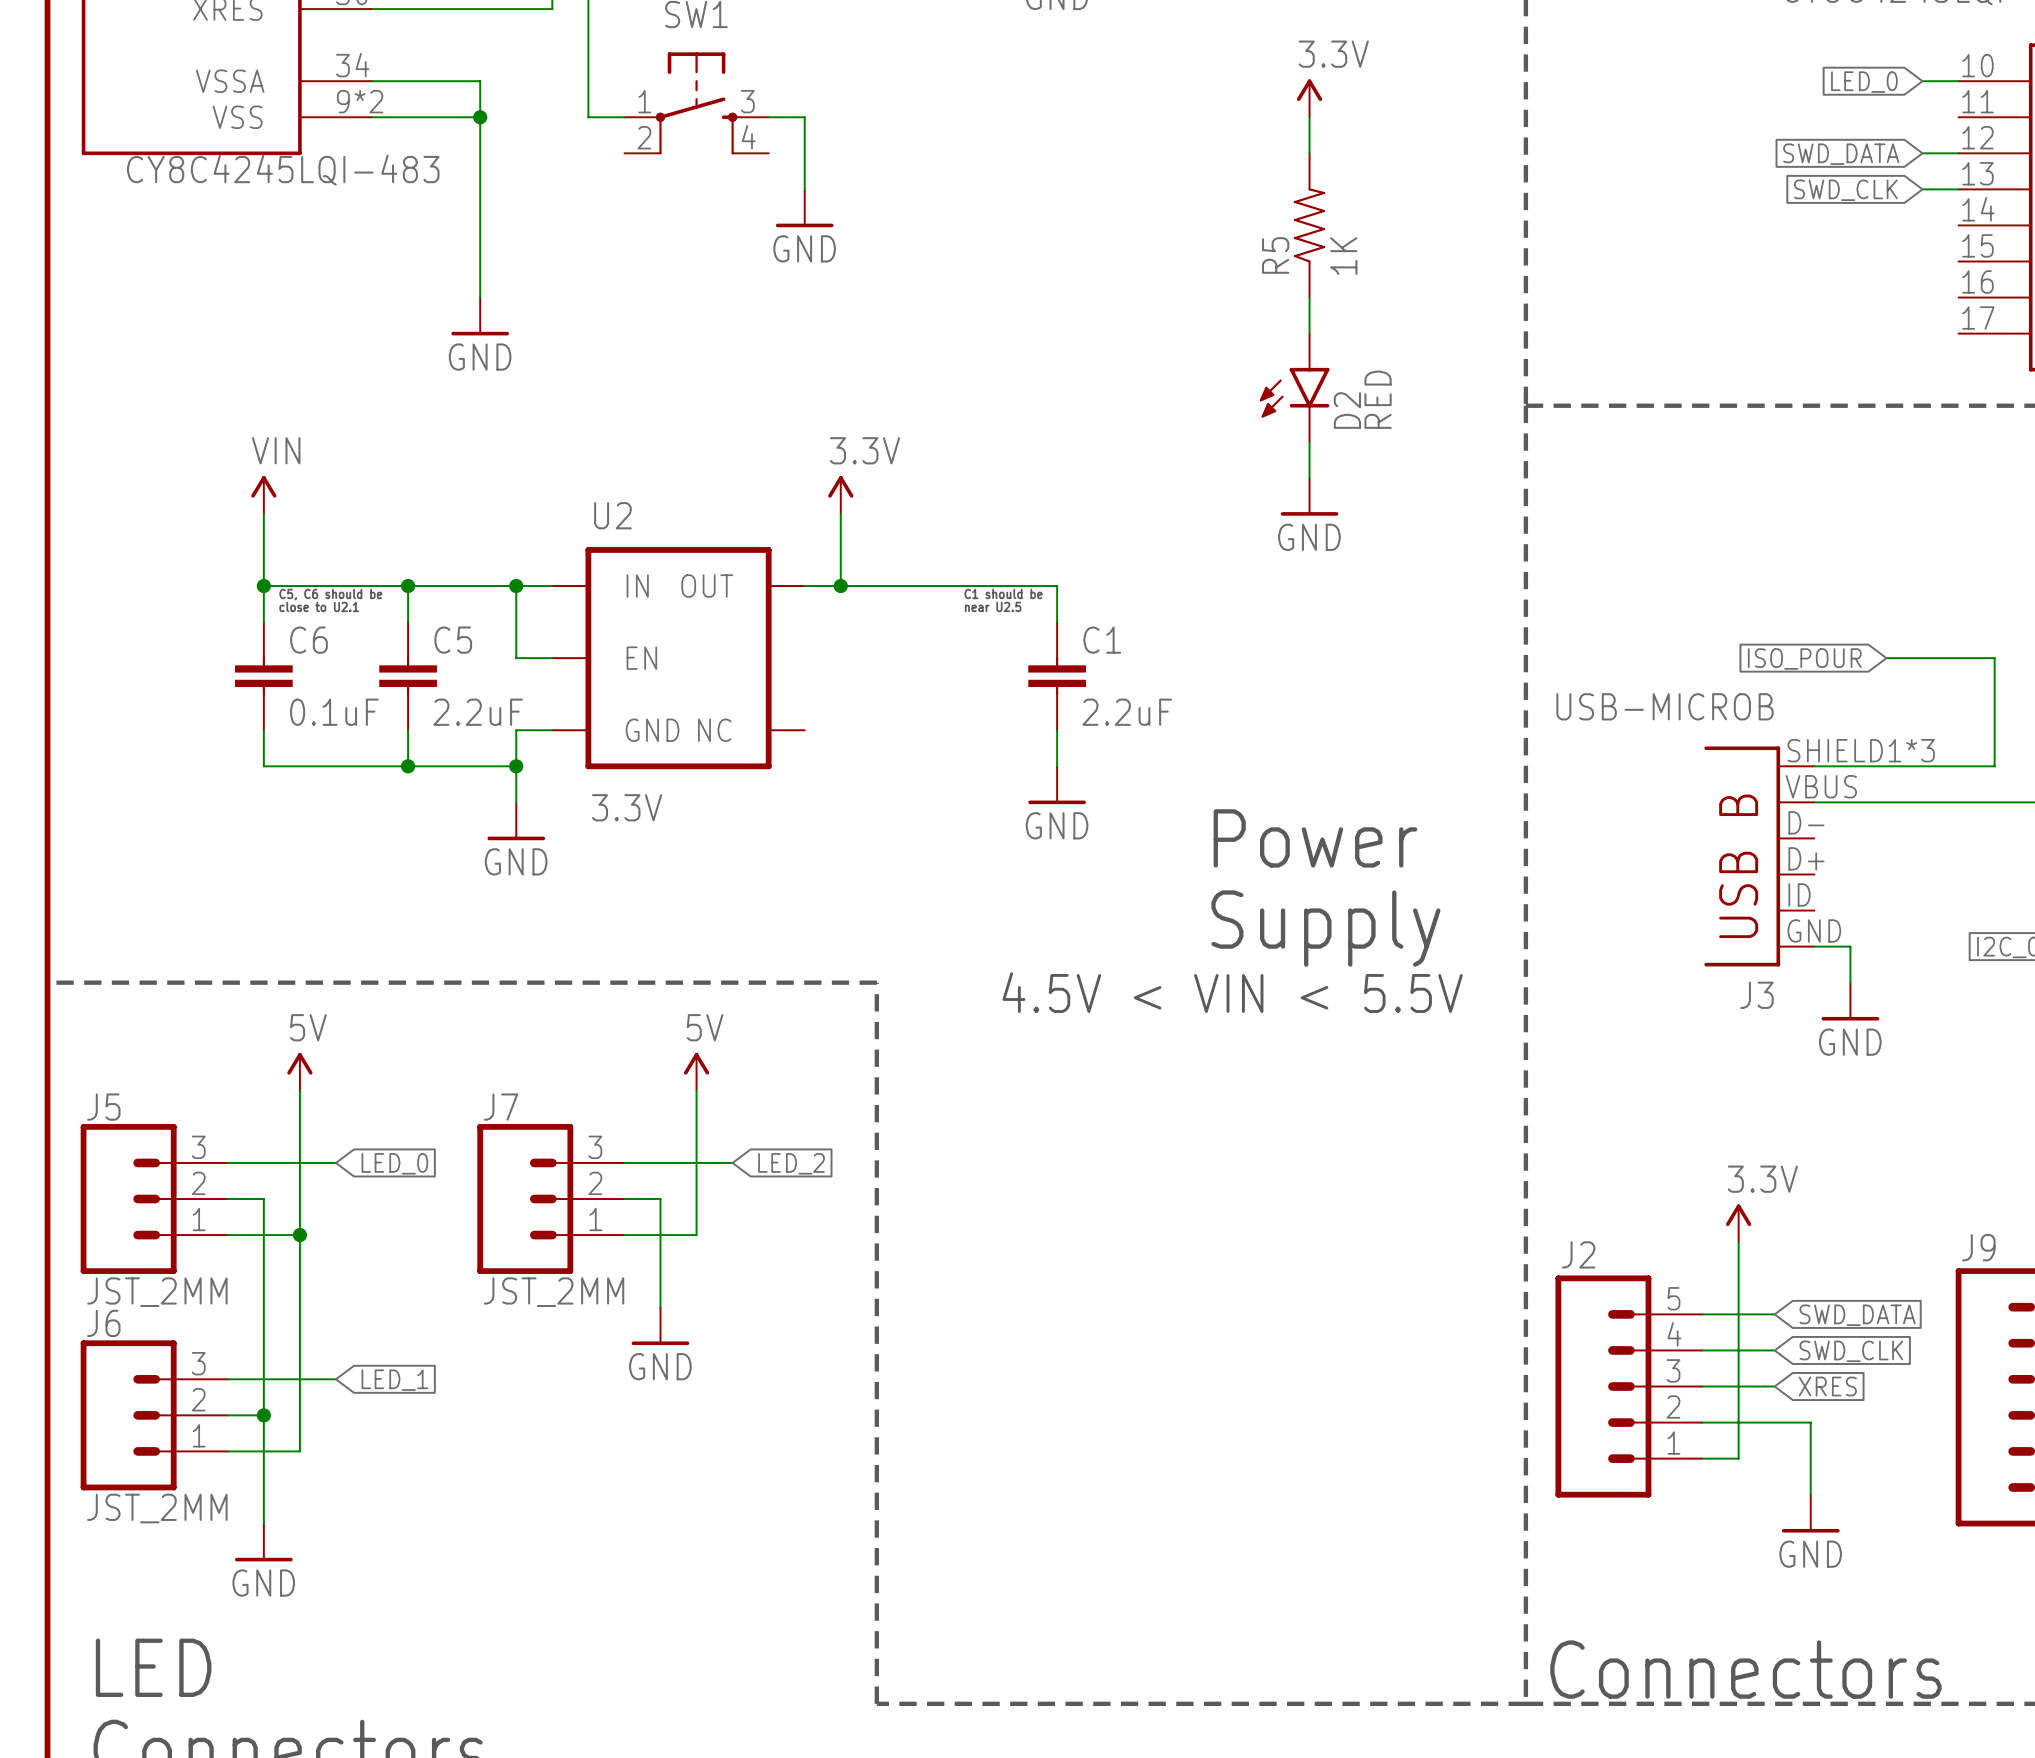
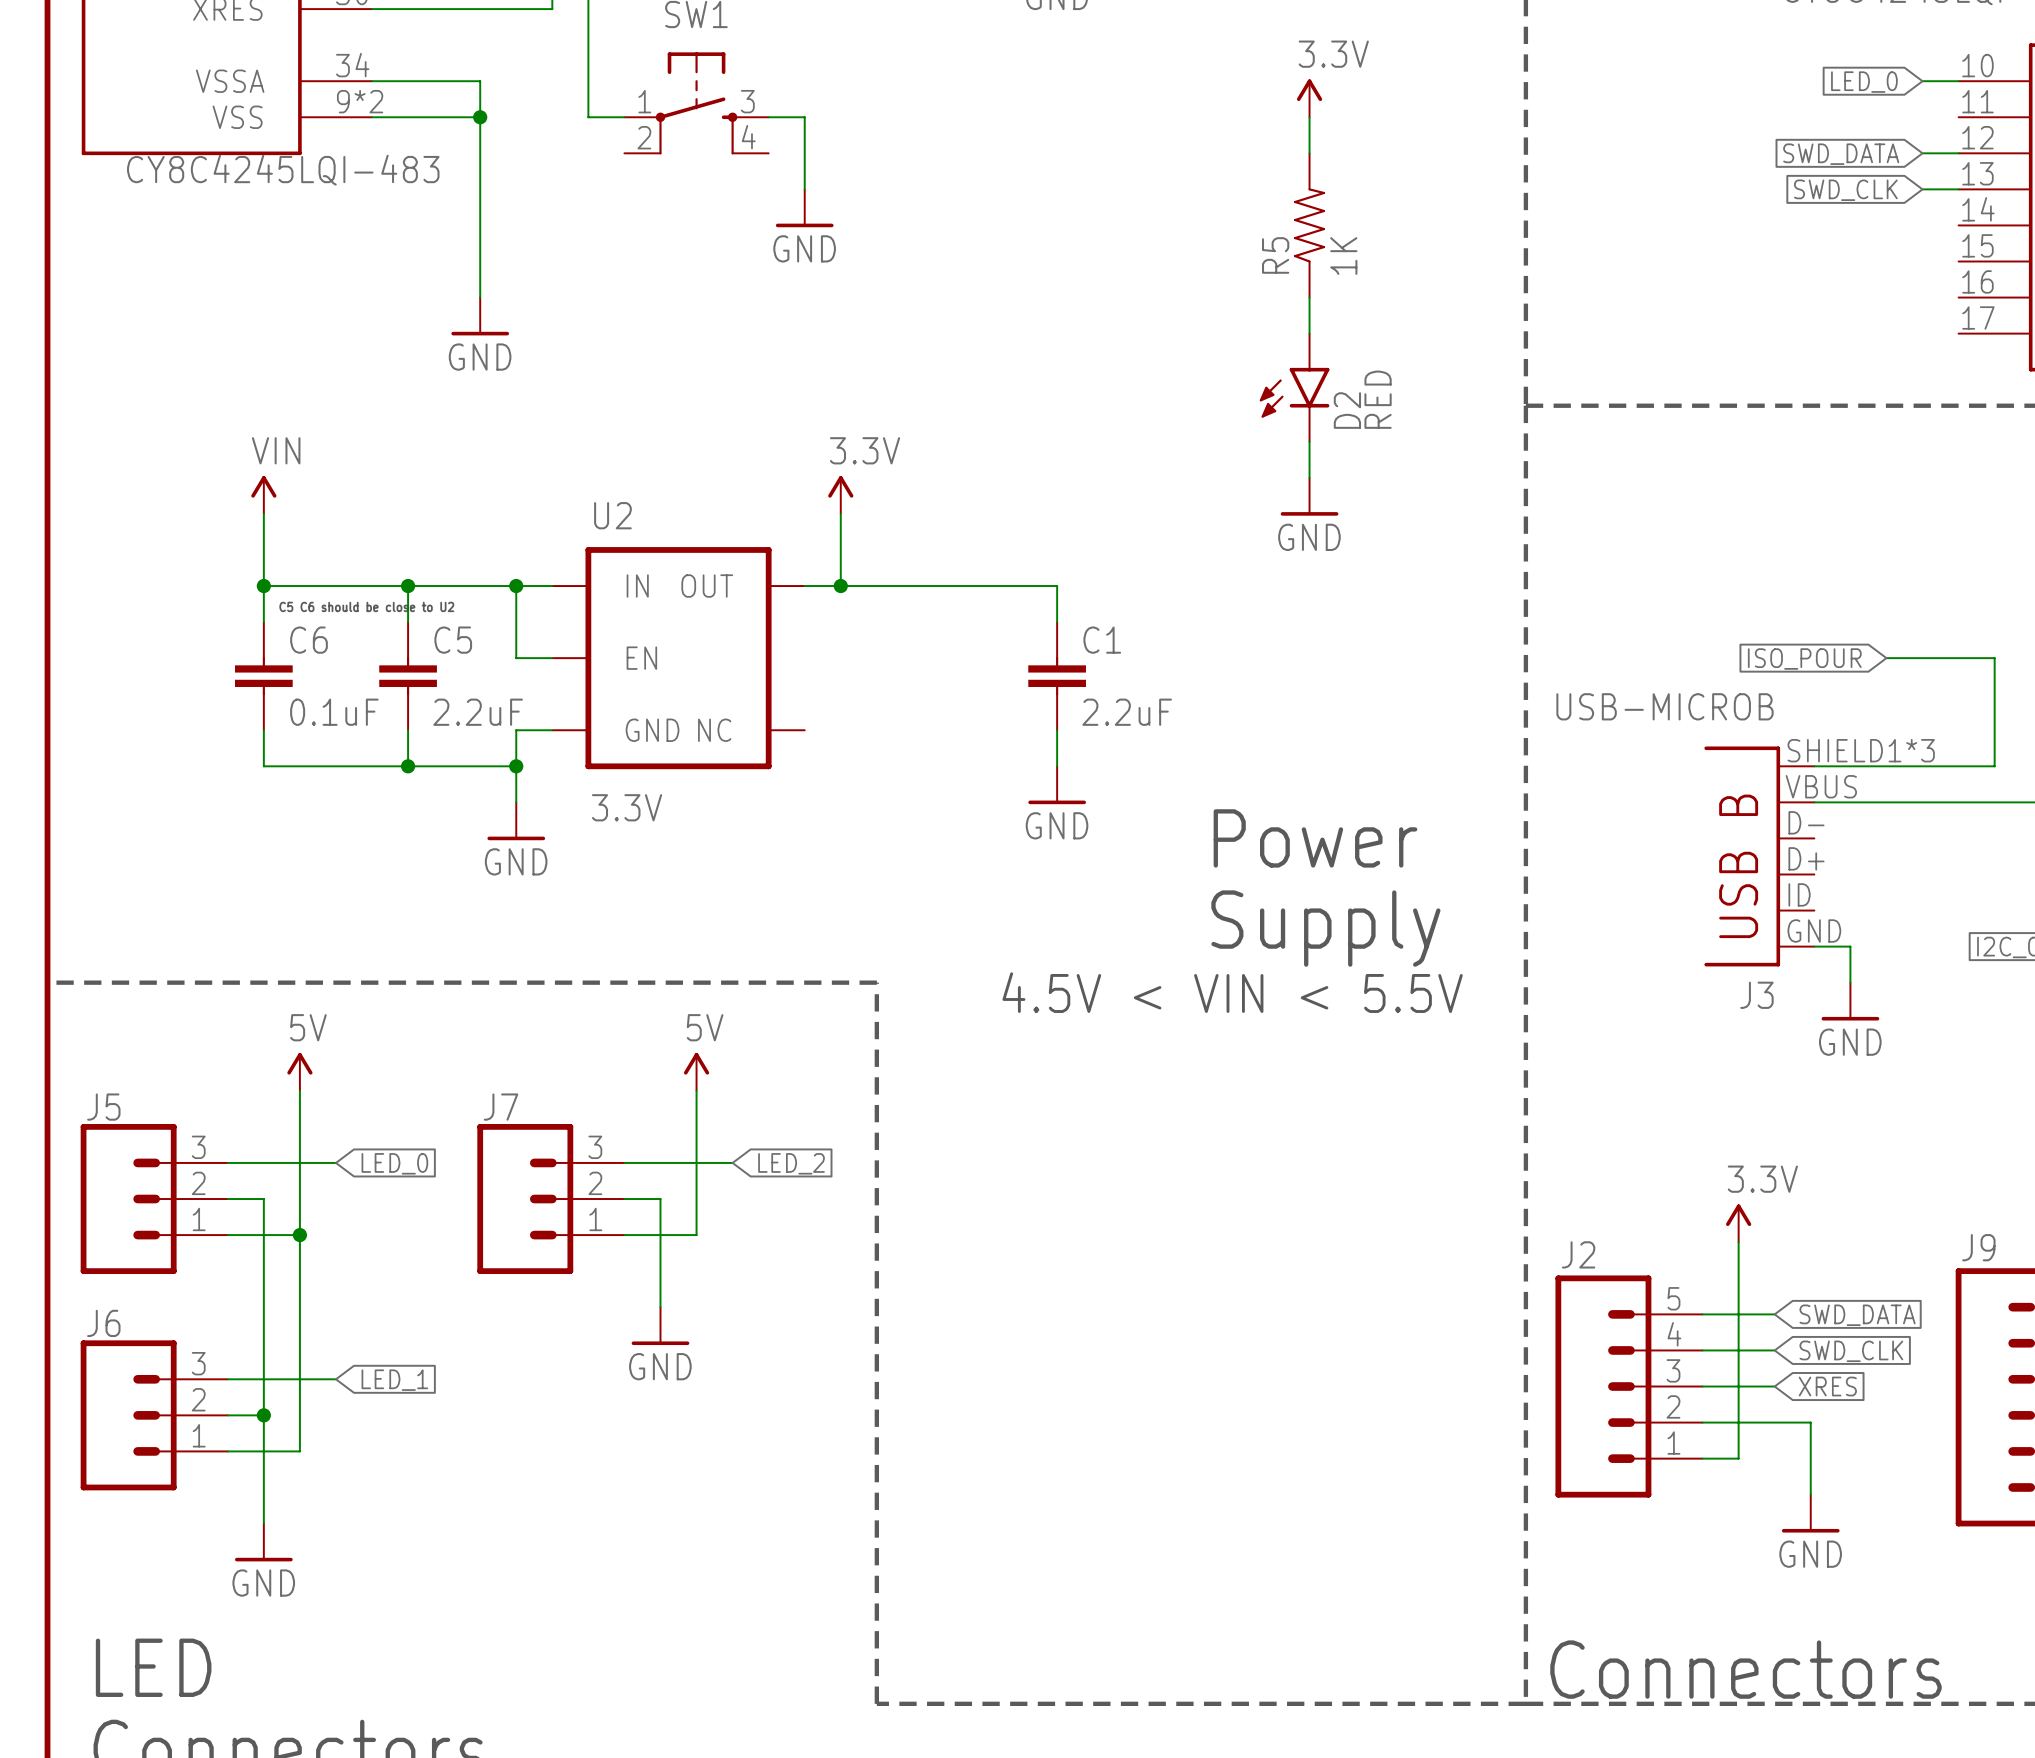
text: C1 should be (1003, 593) -> none
text: C5, C6 should be (330, 594) -> none
text: close to U2.1 (319, 606) -> C5 C6 should be close to U2 (366, 606)
text: near U2.5 (993, 606) -> none
J5 value: JST_2MM (157, 1292) -> none
J7 value: JST_2MM (554, 1292) -> none
J6 value: JST_2MM (157, 1508) -> none

